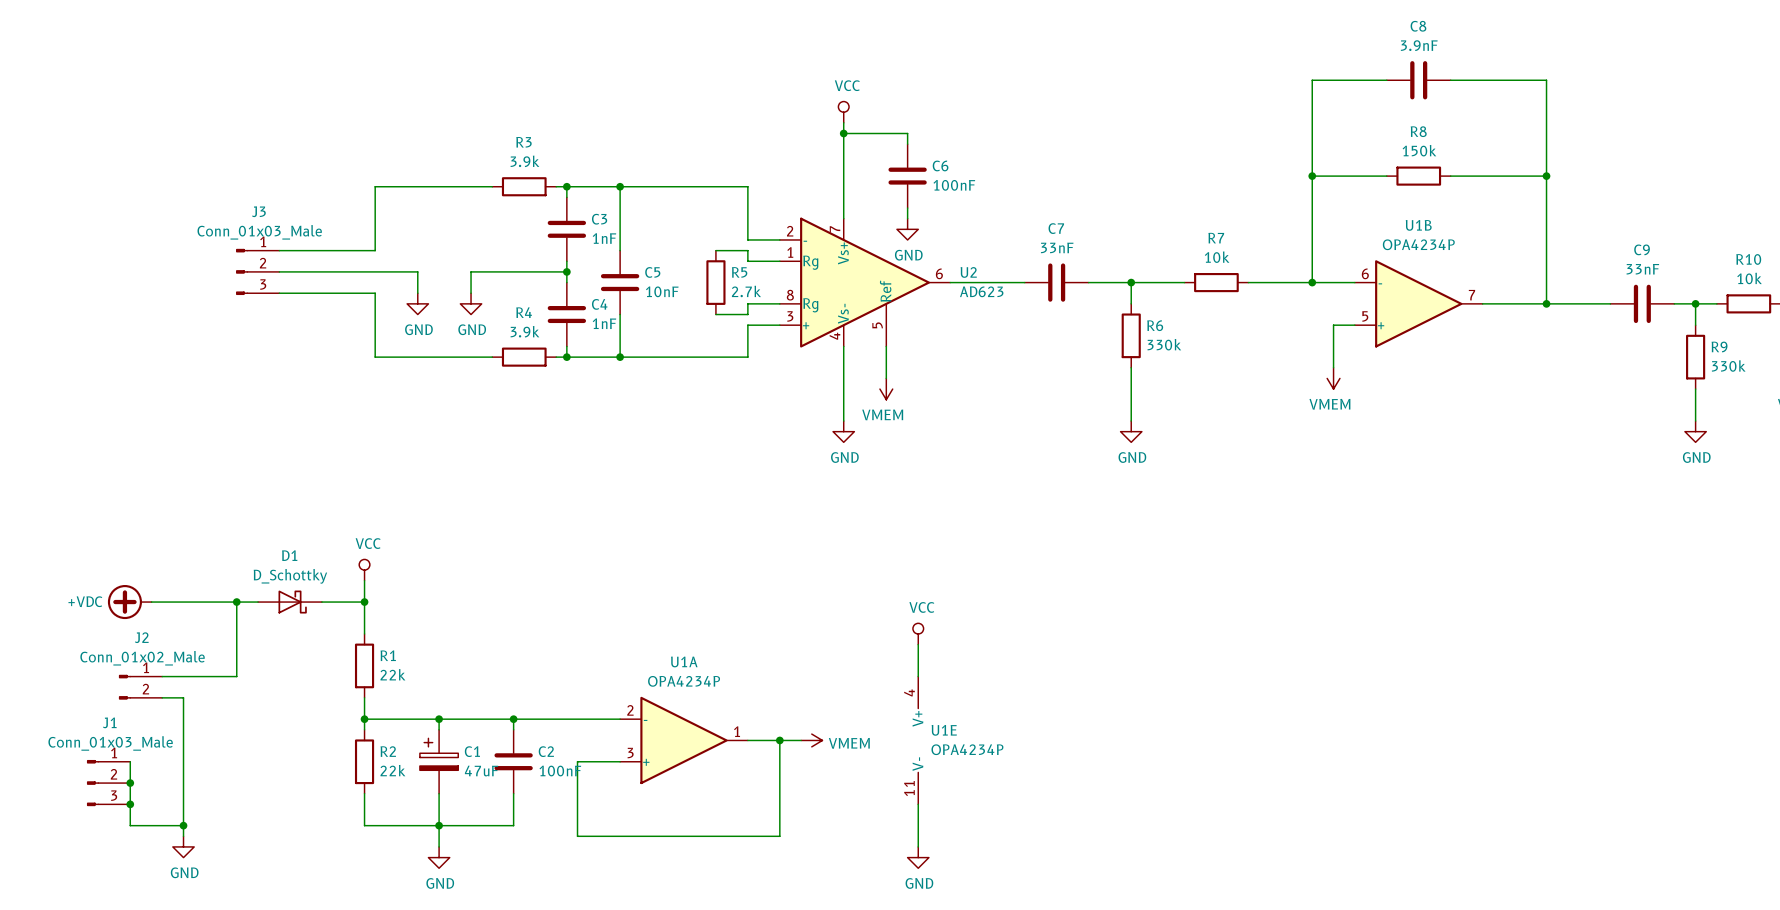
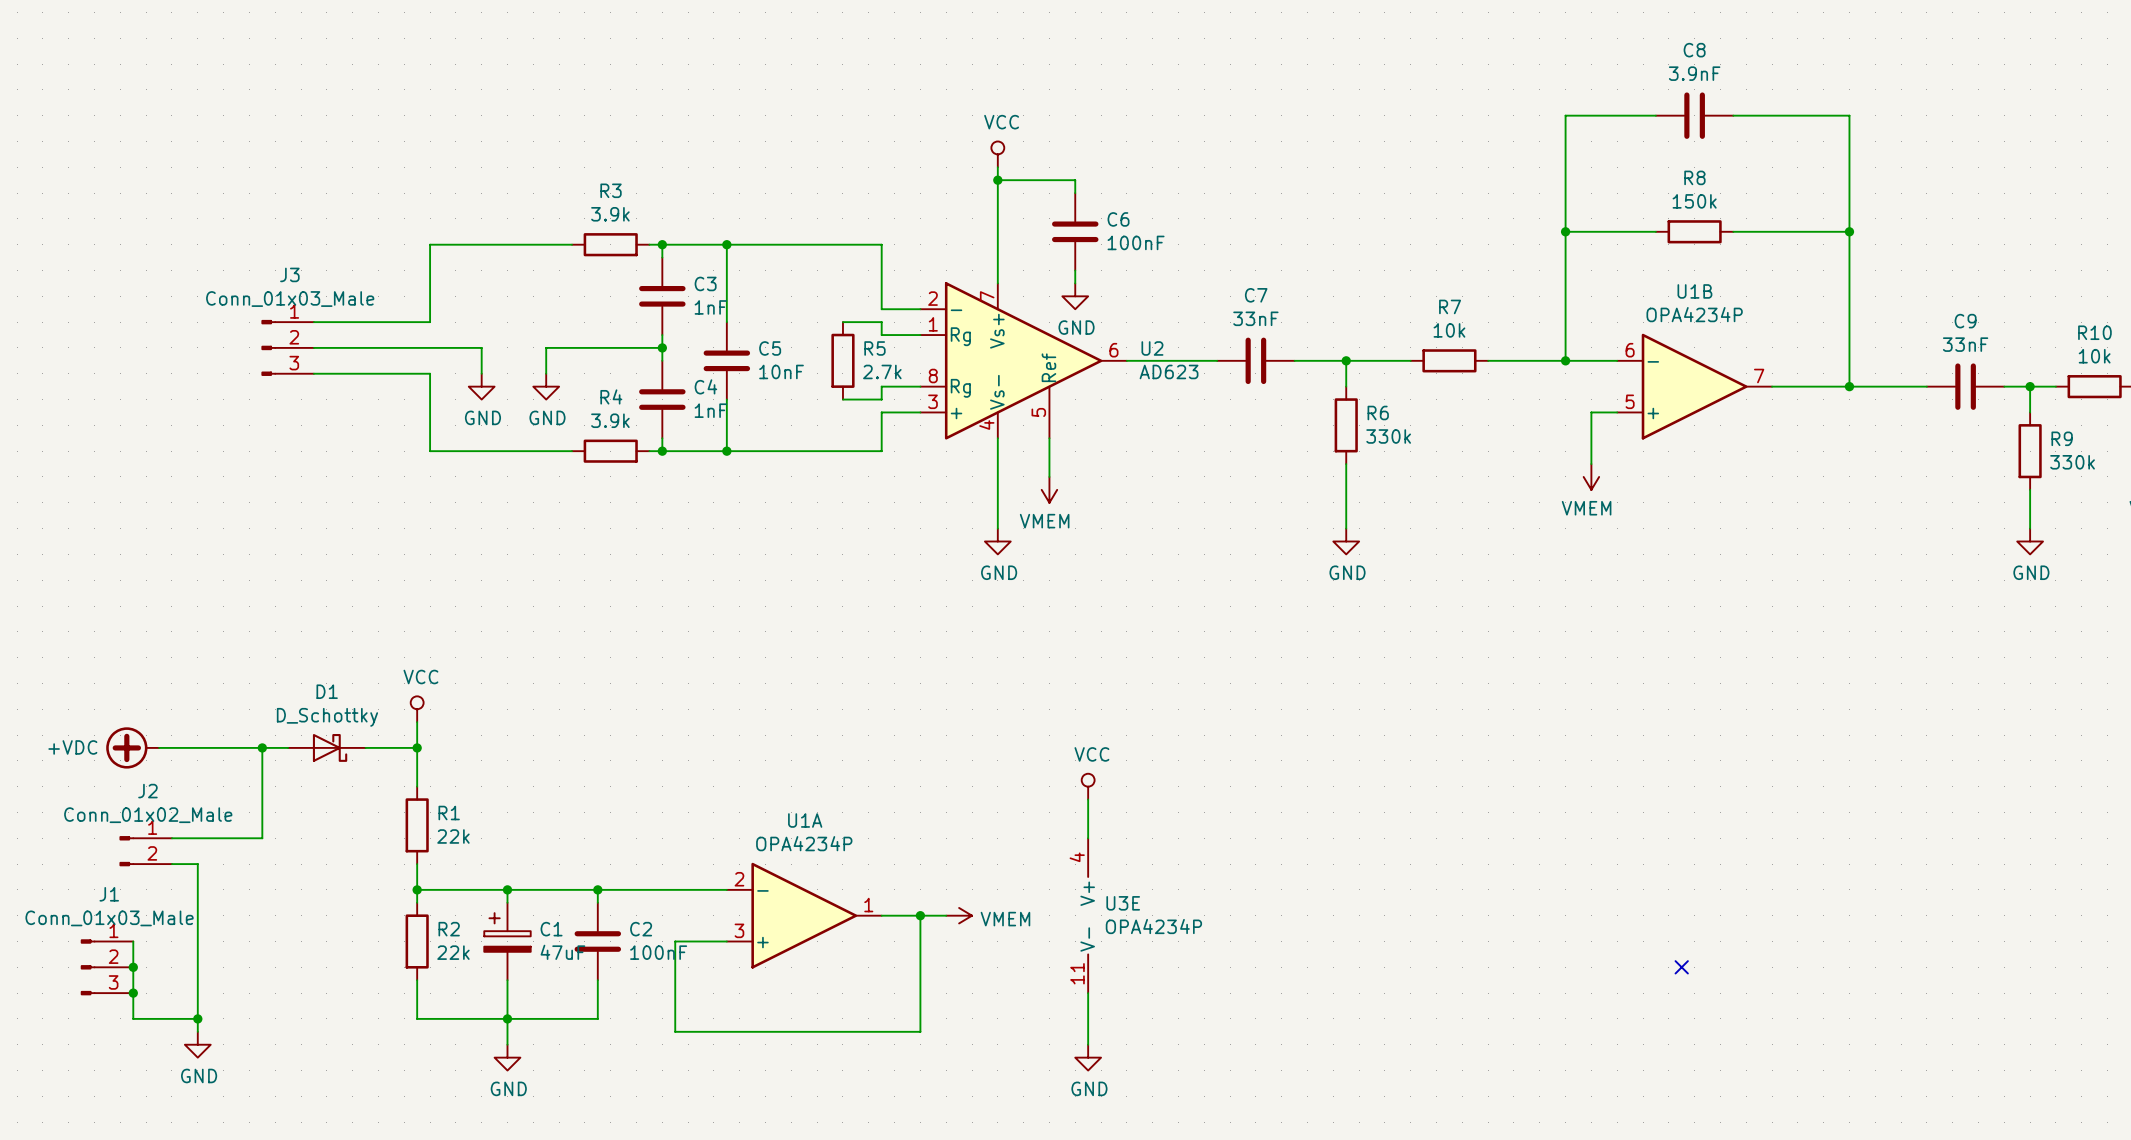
U1E name: U1E (944, 730) -> U3E (1123, 903)
no-connect mark: none -> (1681, 967)

